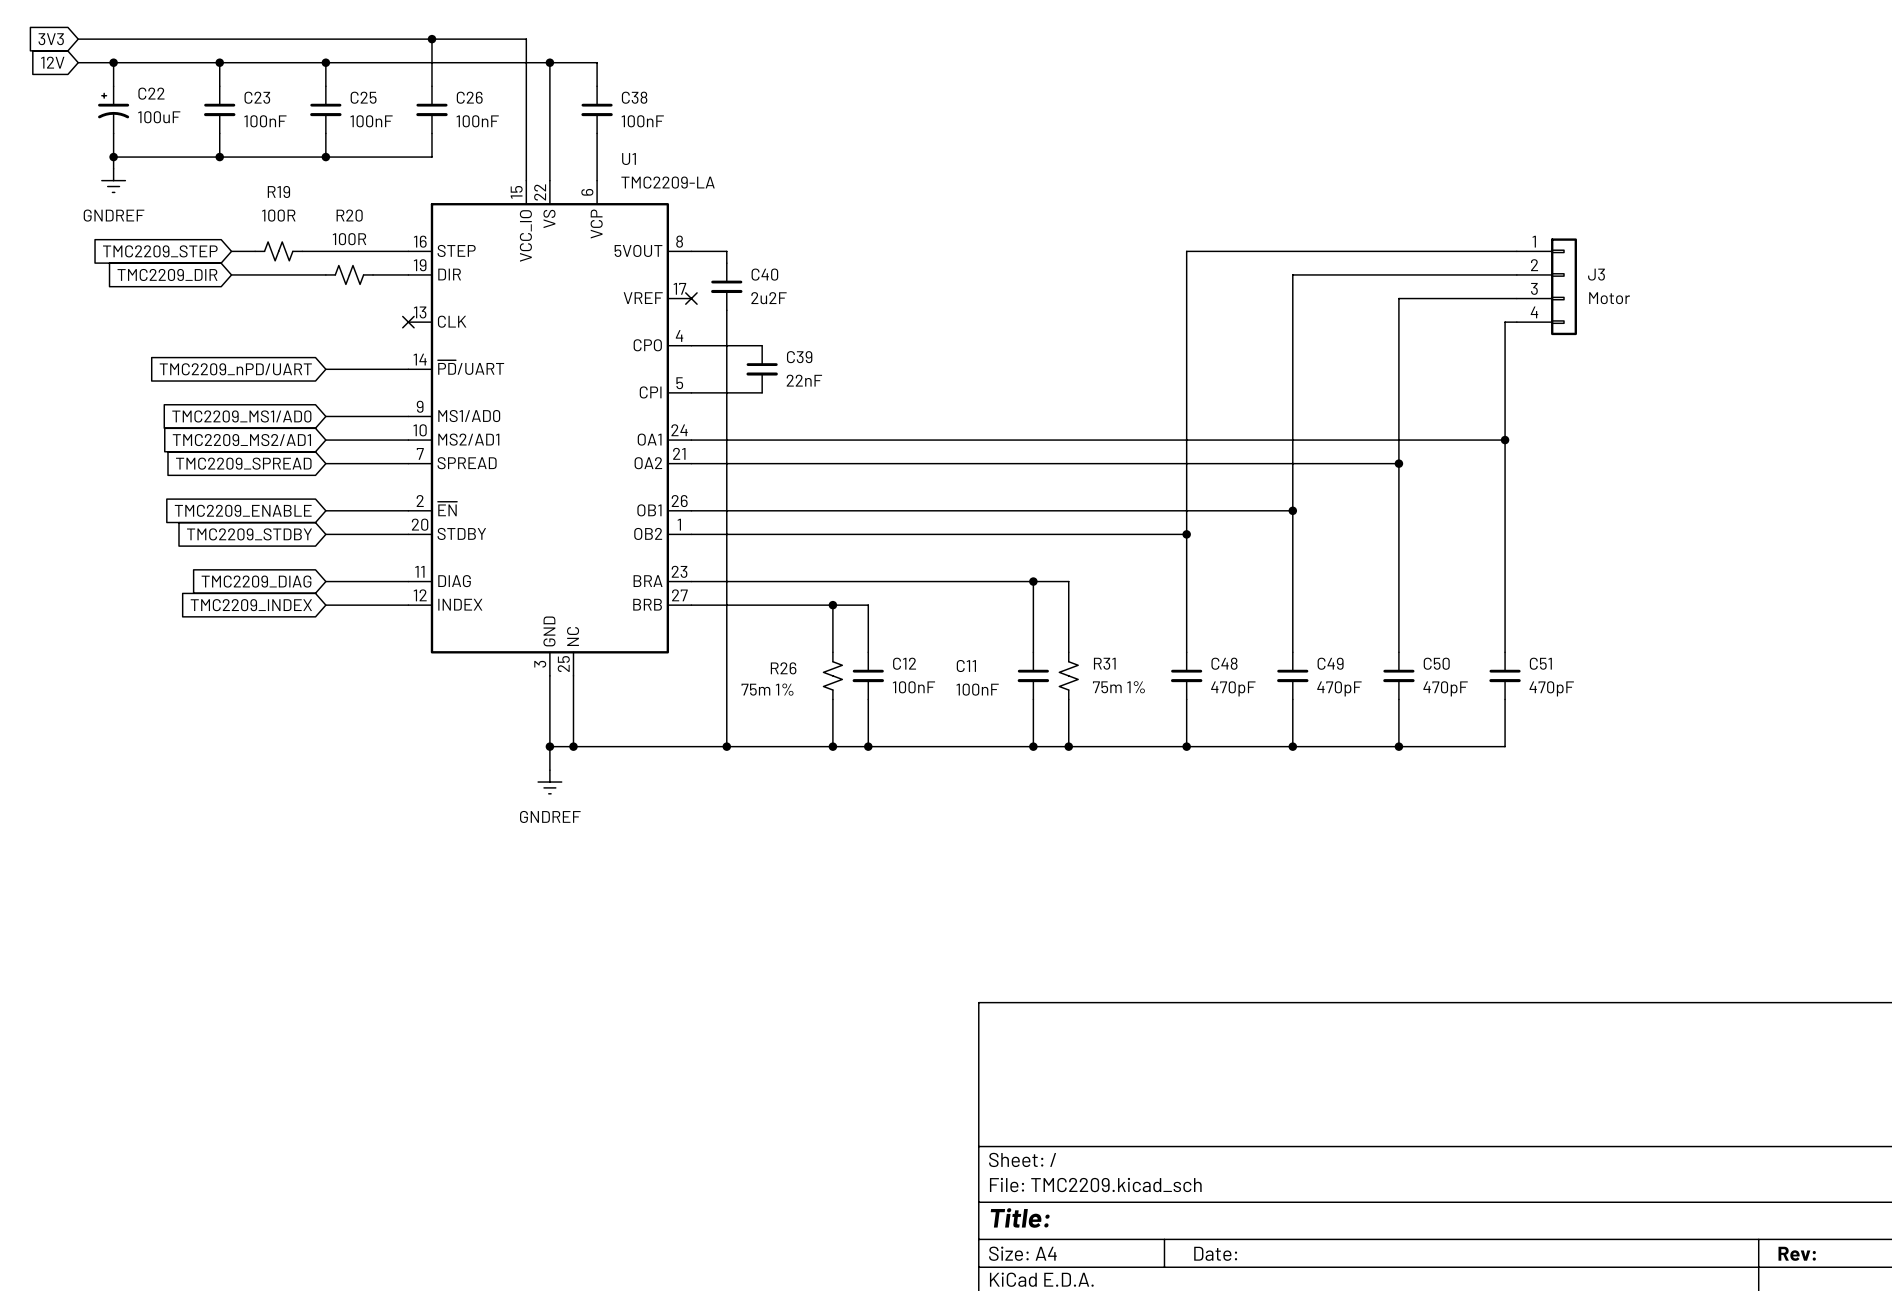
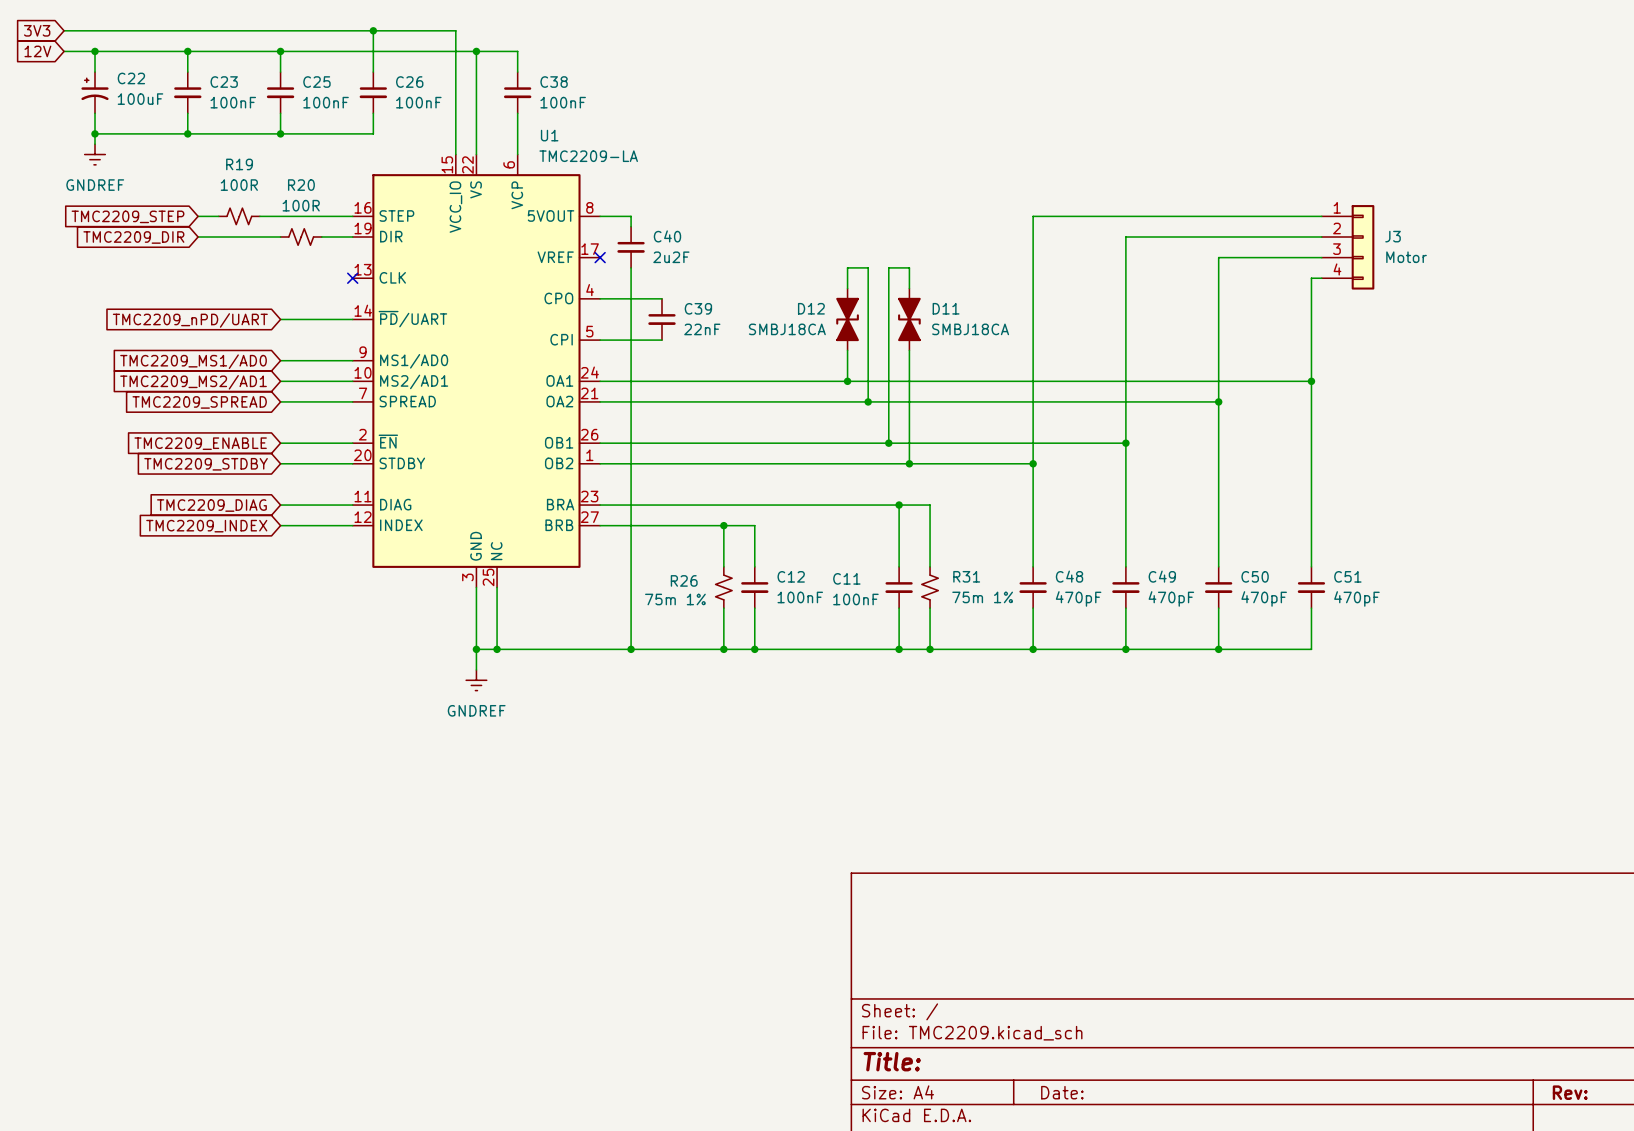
wire: none -> (847, 288) (847, 267) (868, 267) (868, 401)
wire: none -> (909, 288) (909, 267) (888, 267) (888, 443)
D12: none -> SMBJ18CA (847, 319)
D11: none -> SMBJ18CA (909, 319)
wire: none -> (847, 350) (847, 381)
wire: none -> (909, 350) (909, 463)
junction: none -> (847, 381)
junction: none -> (868, 401)
junction: none -> (888, 443)
junction: none -> (909, 463)

